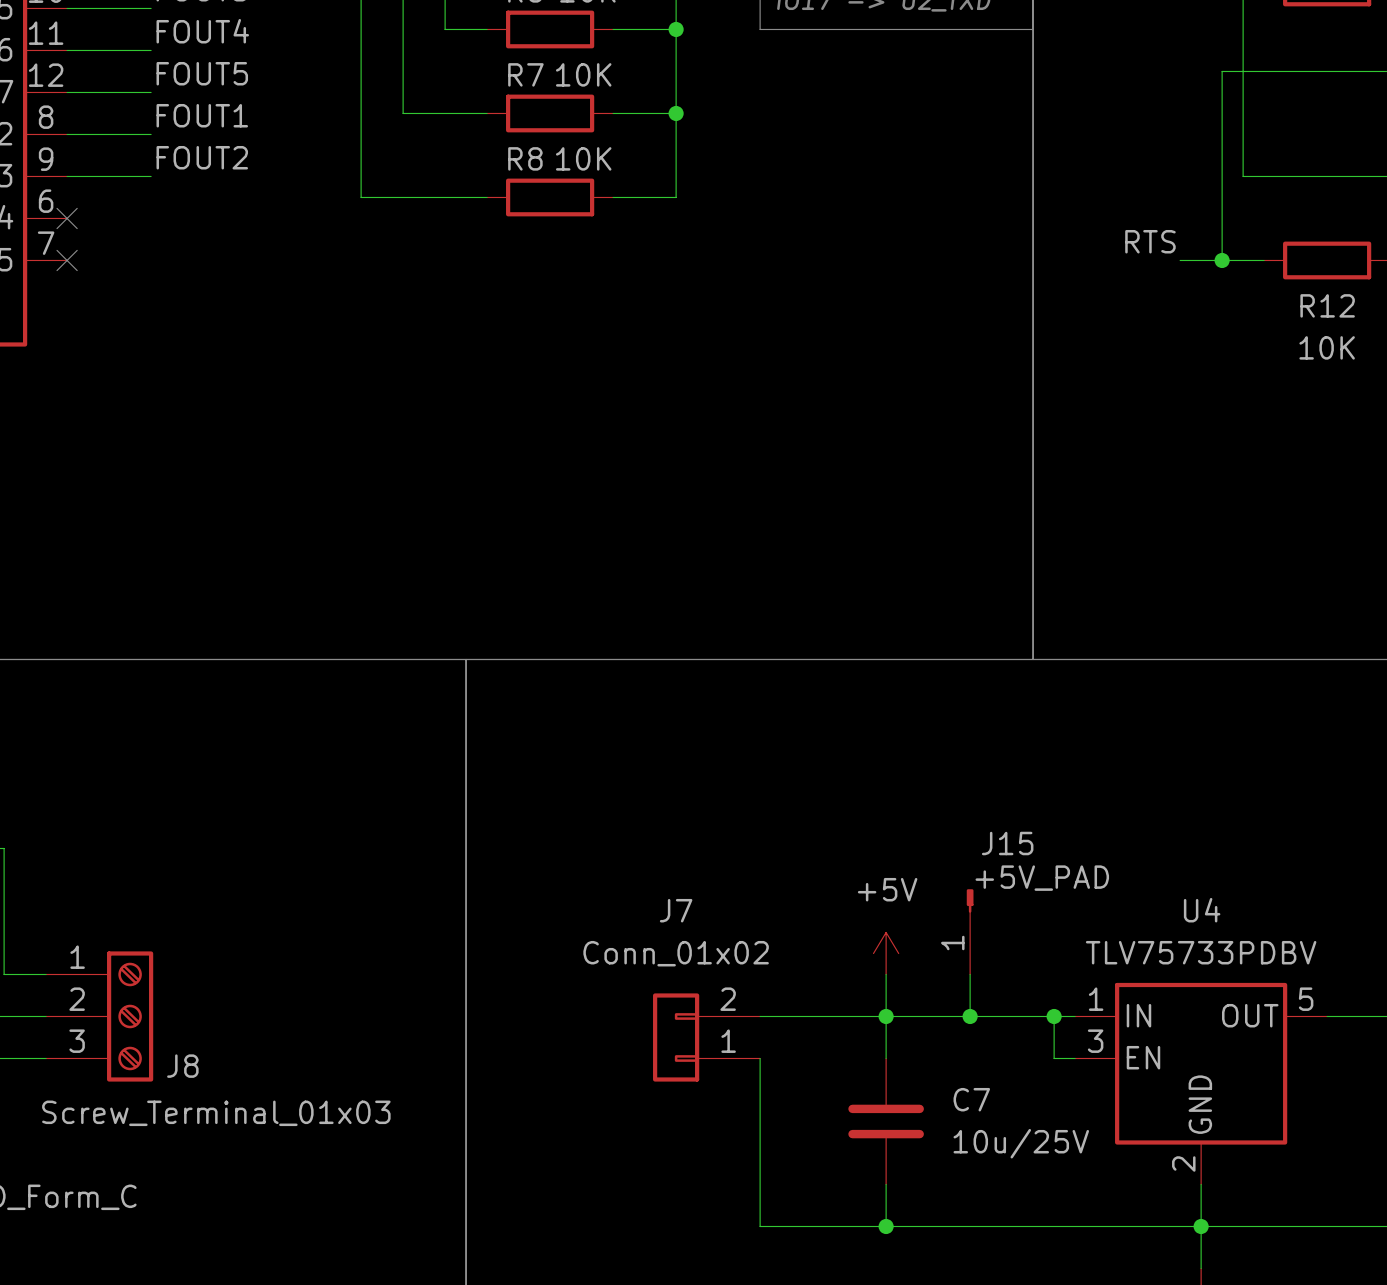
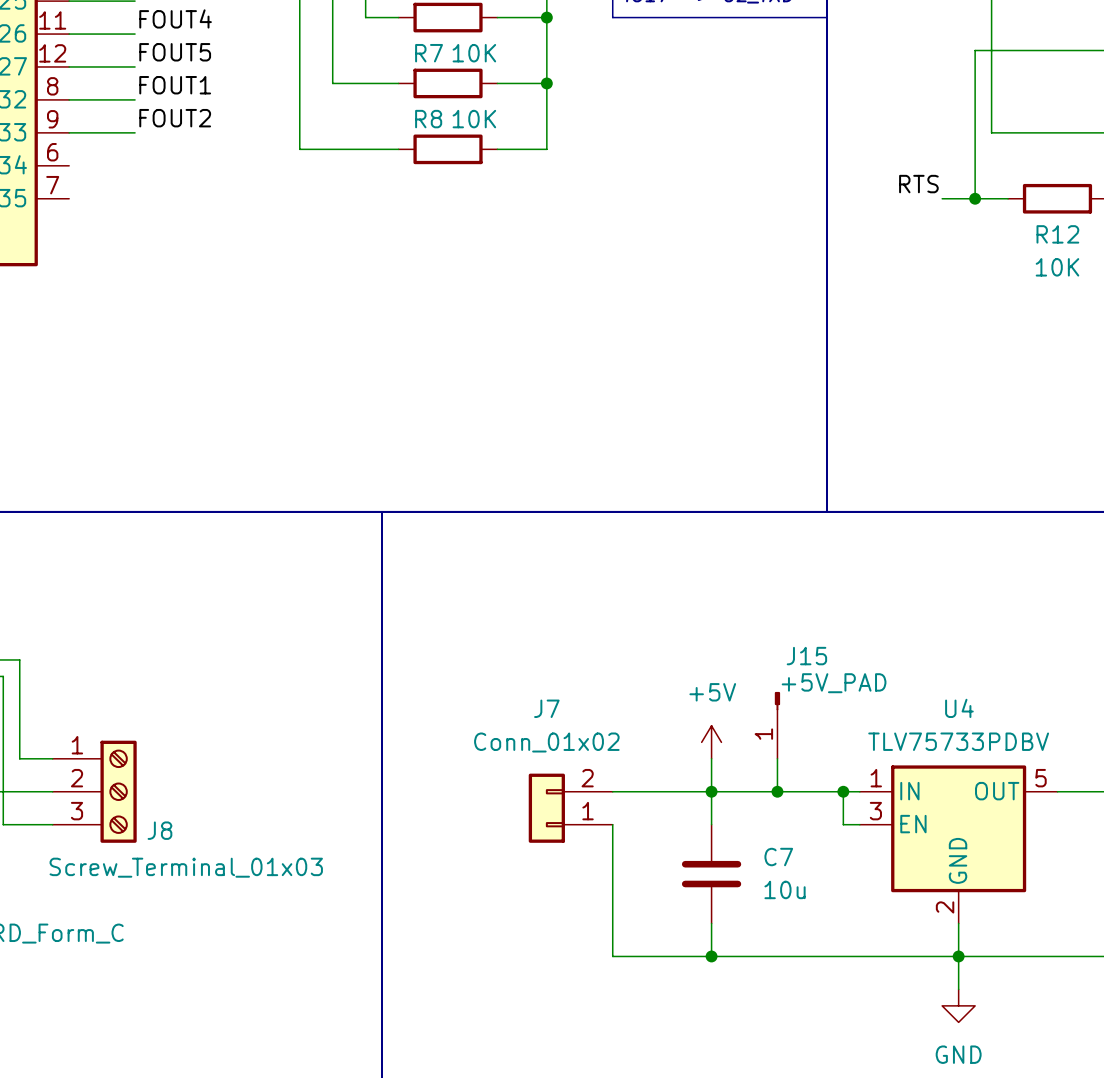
no-connect mark: (67, 218) -> none
no-connect mark: (67, 260) -> none
C7 value: 10u/25V (1021, 1143) -> 10u (785, 889)

